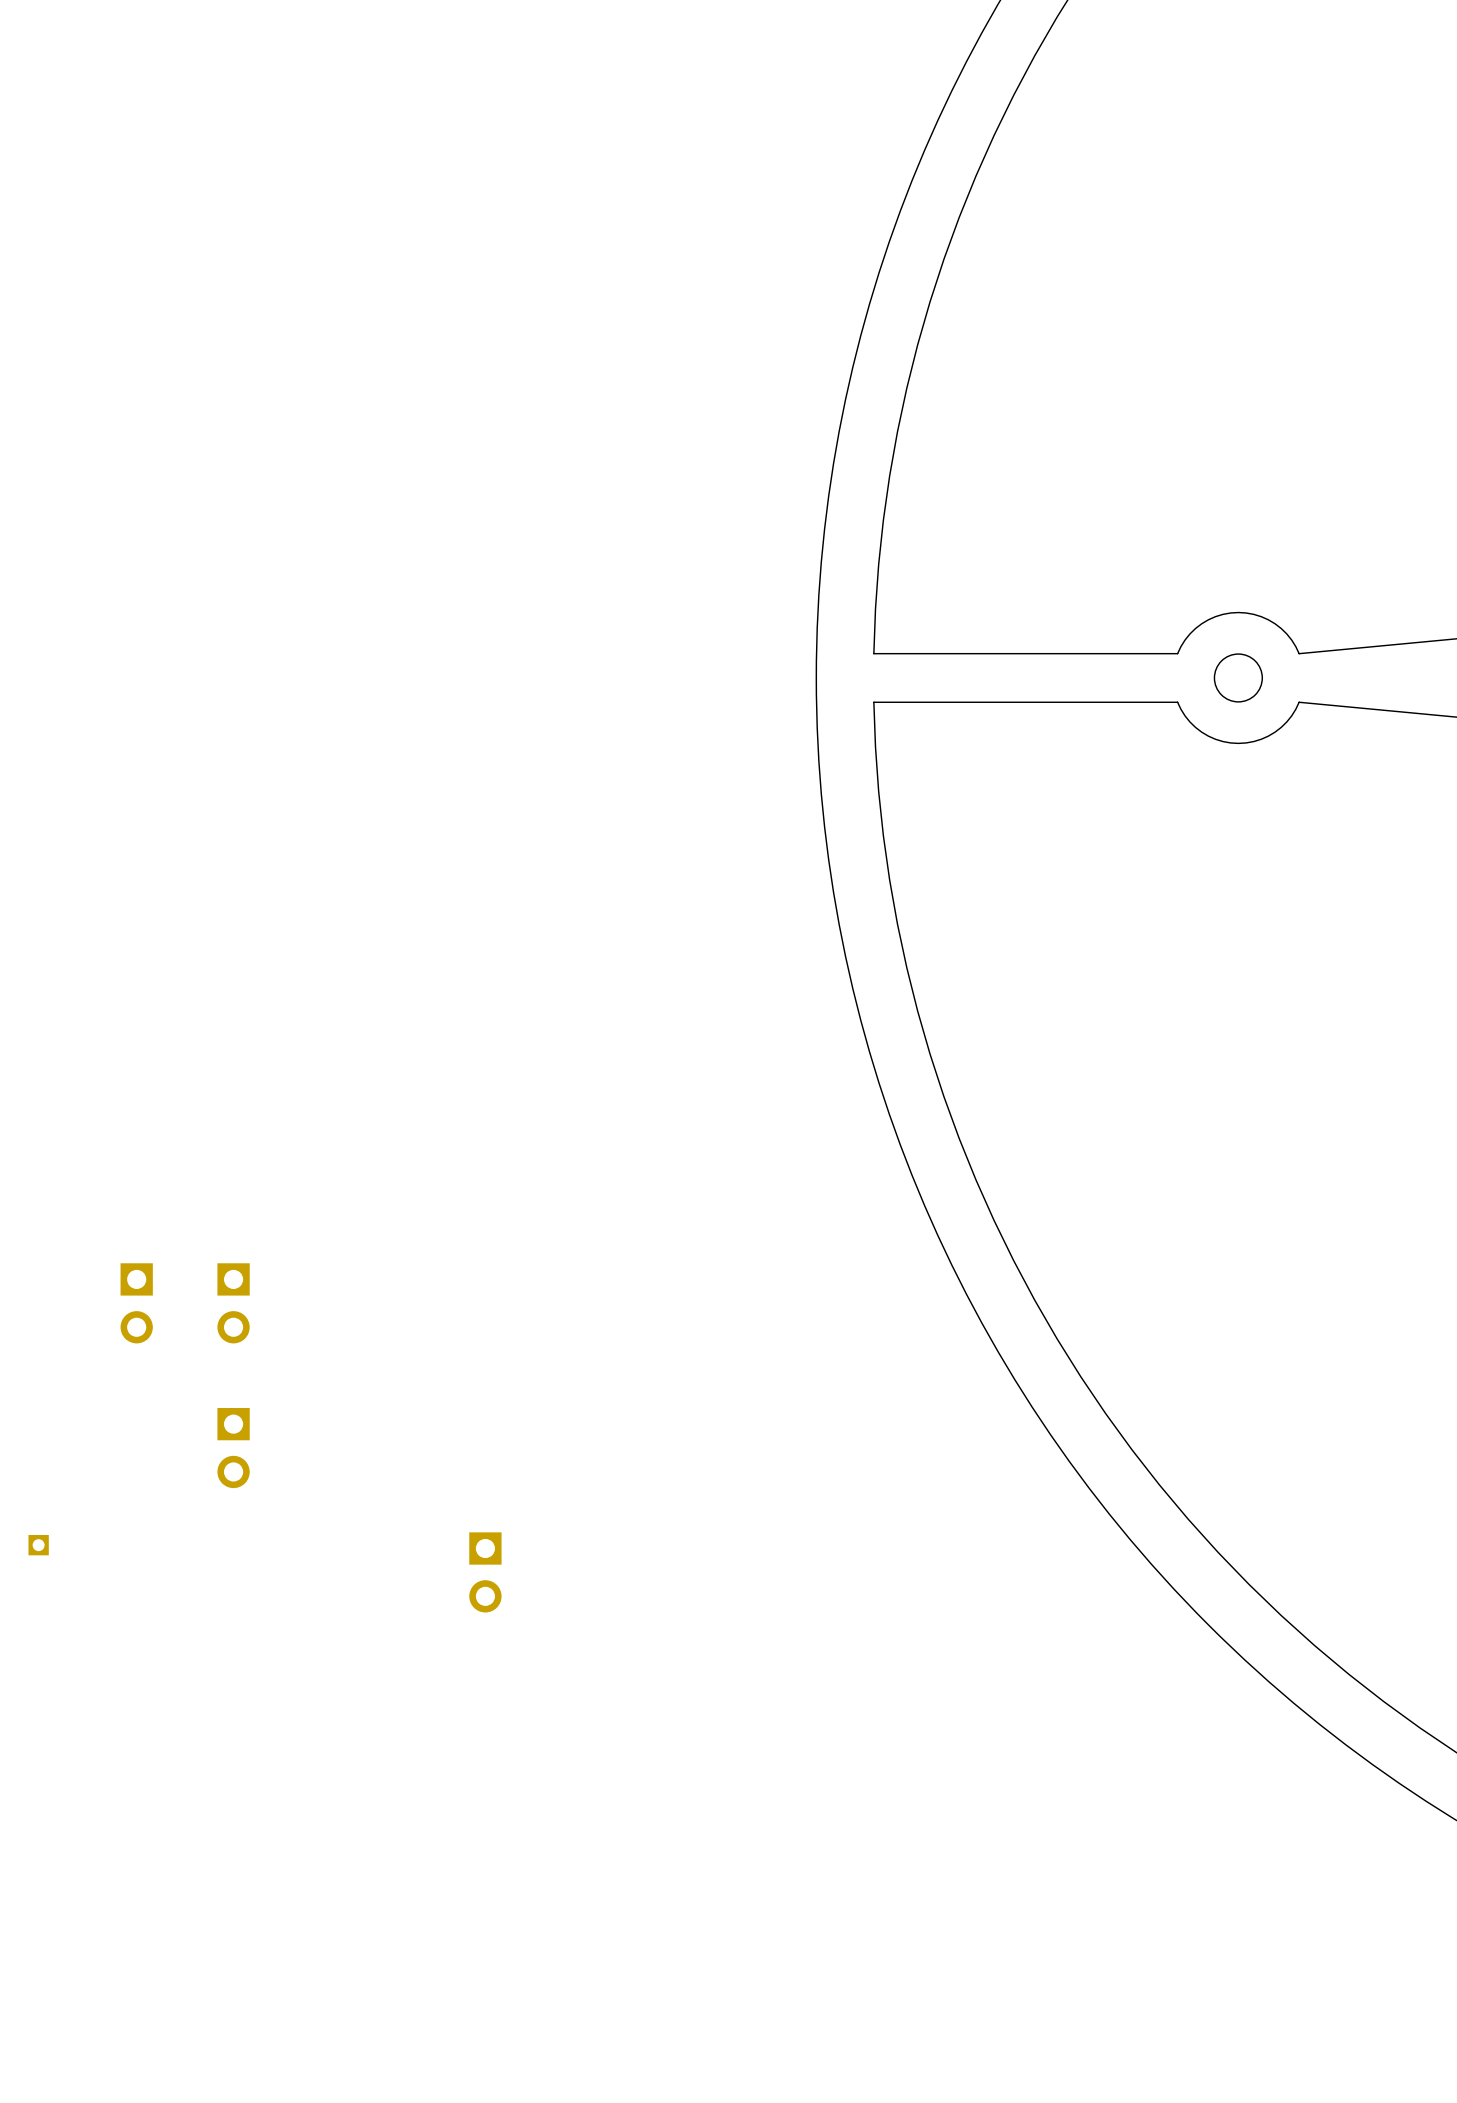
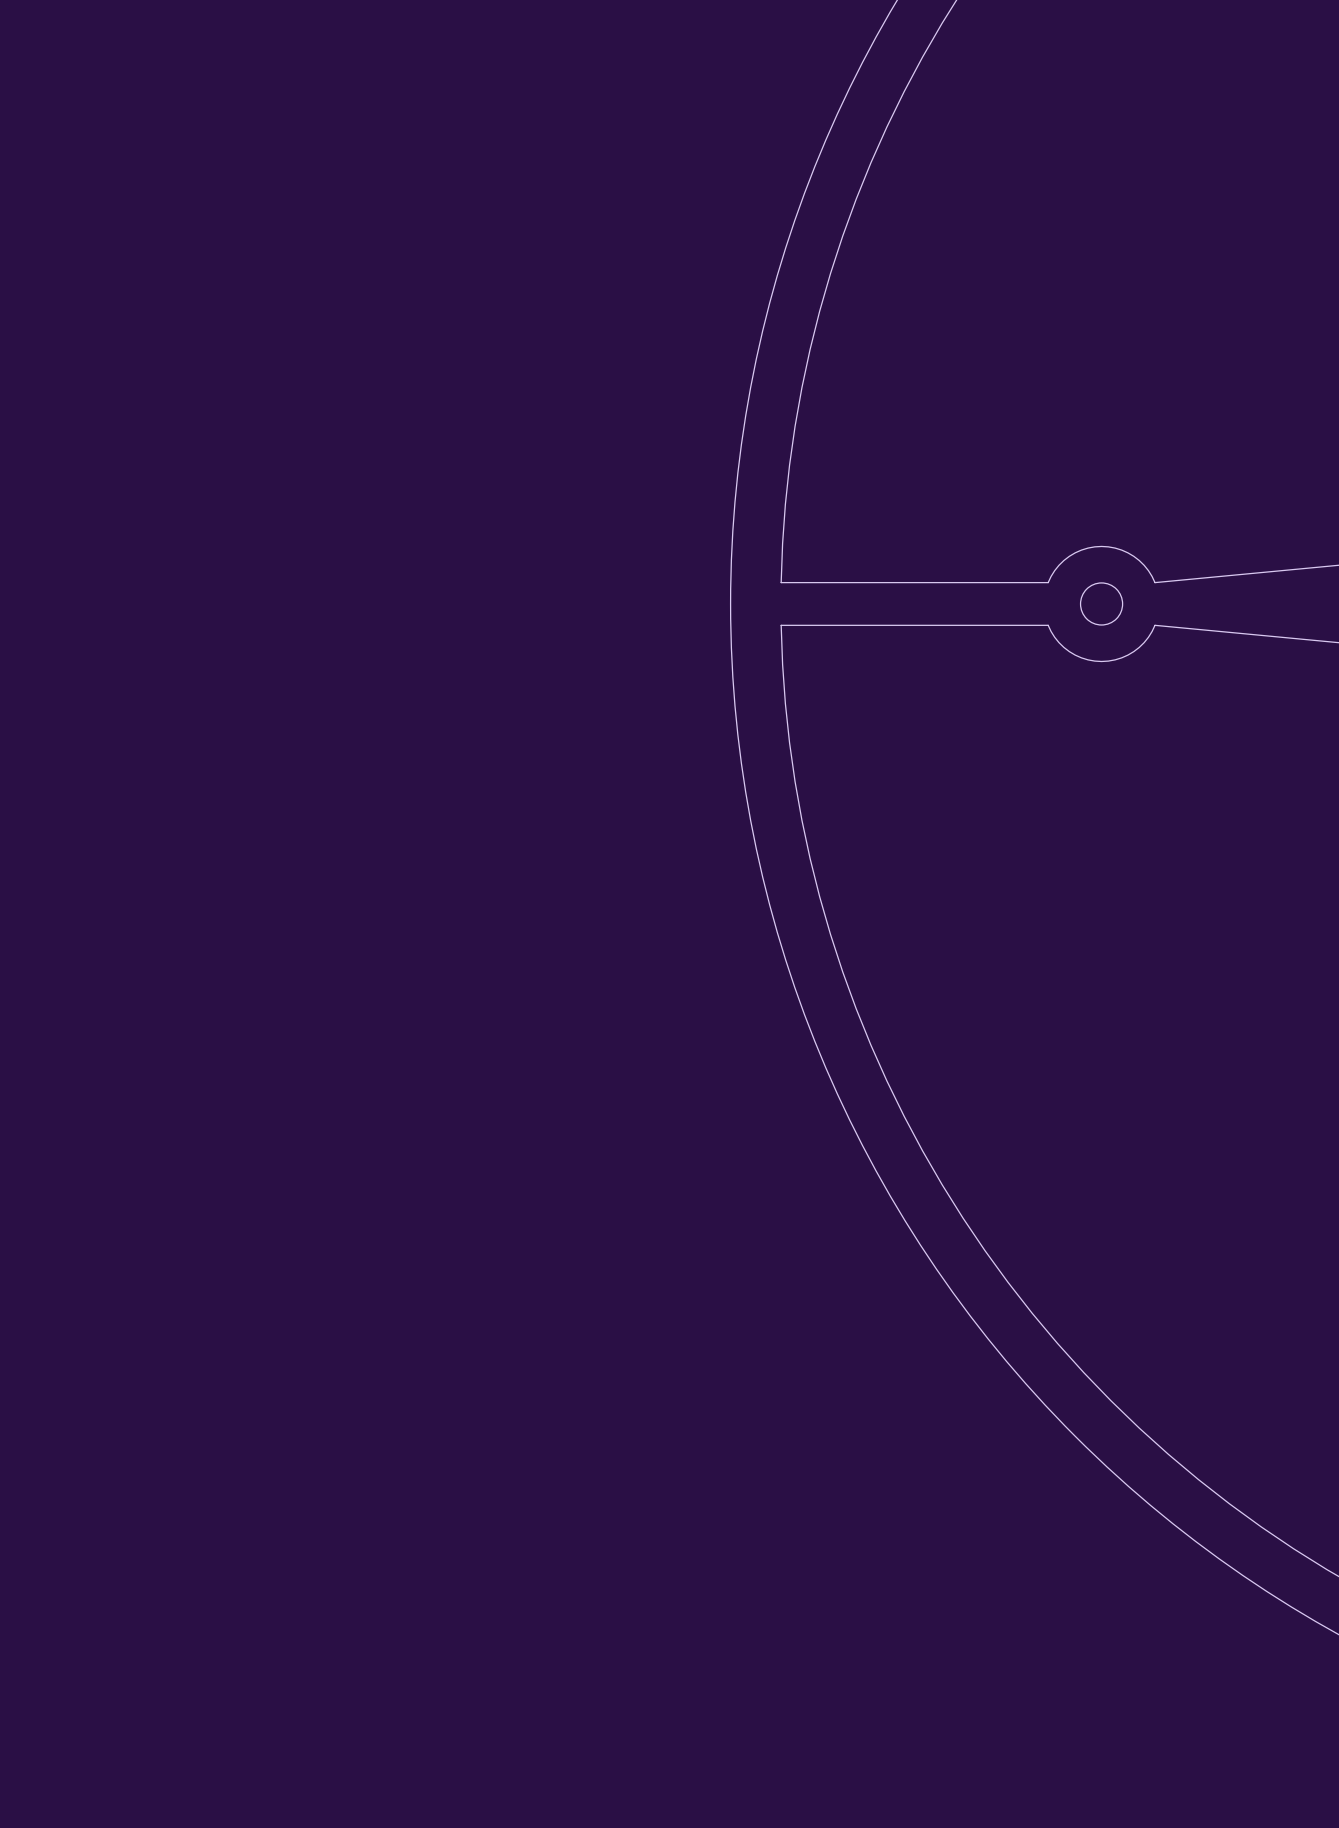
part: (136, 1303) -> none
part: (233, 1303) -> none
part: (233, 1448) -> none
part: (38, 1545) -> none
part: (485, 1572) -> none

